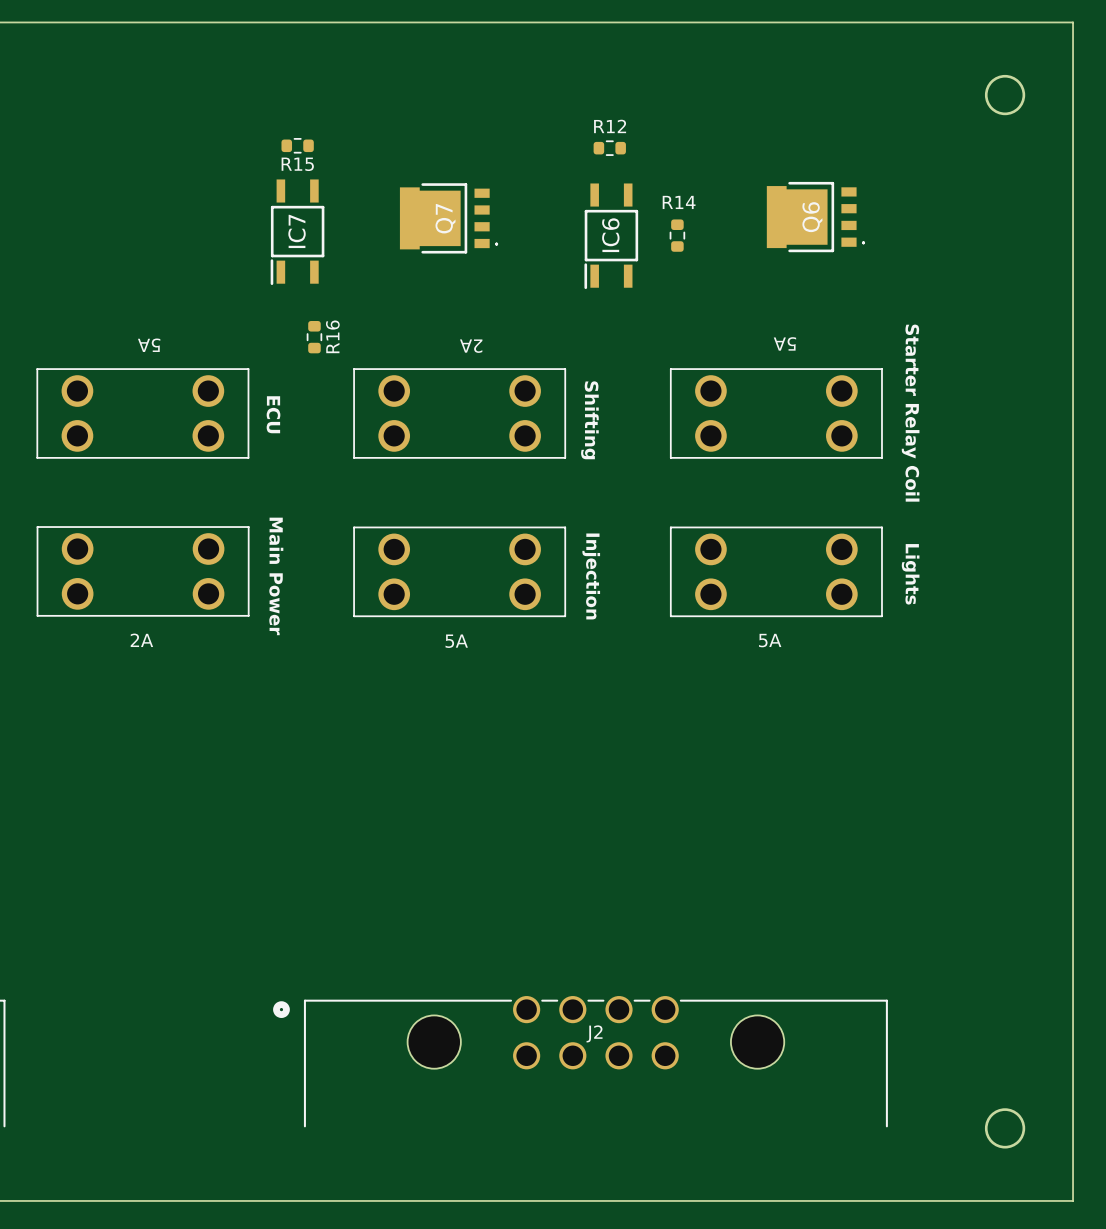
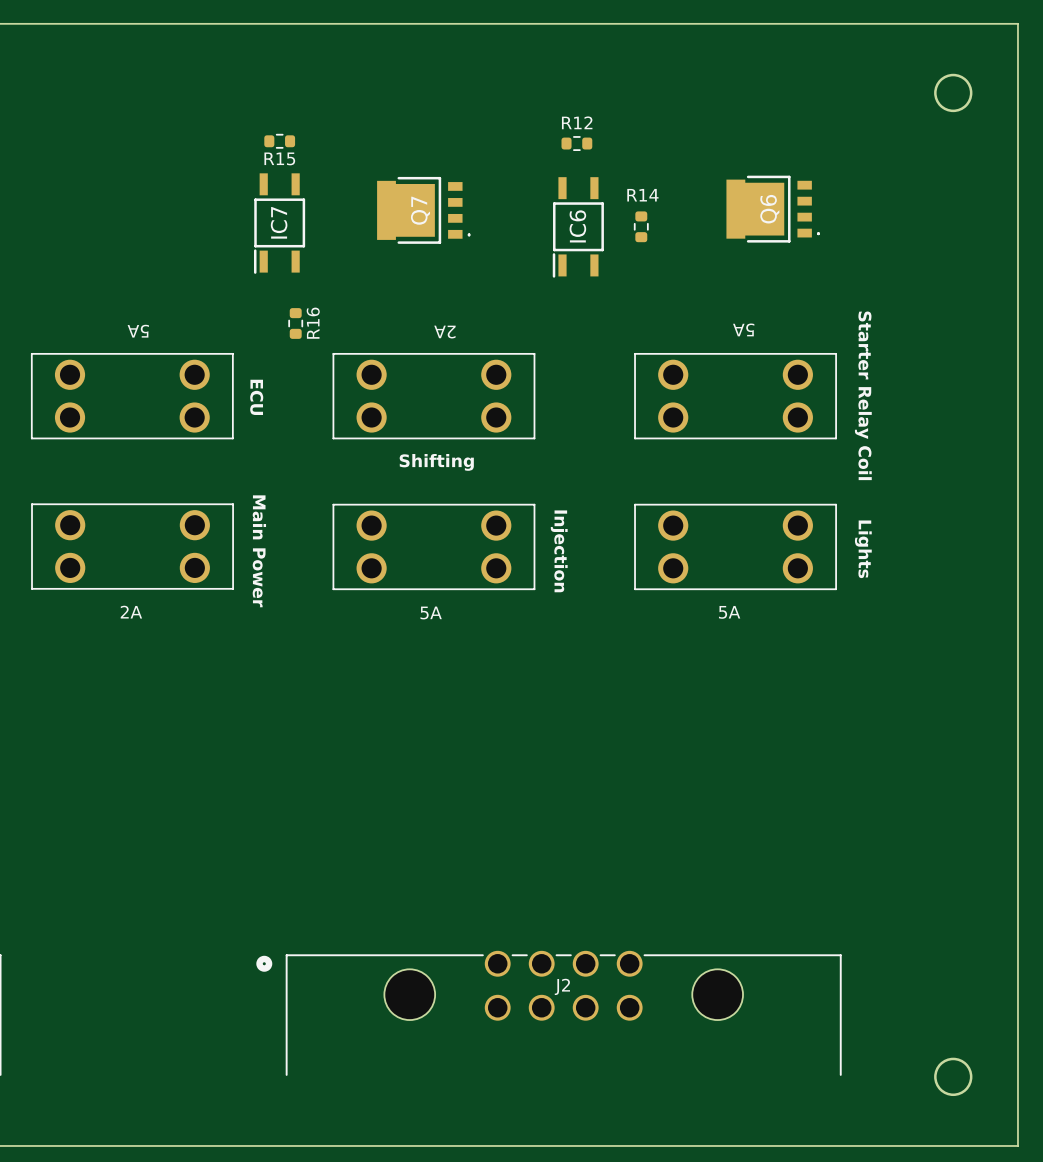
text rotation: 0° (589, 420) -> 90° counterclockwise (436, 462)
text position: Shifting (589, 420) -> Shifting (436, 462)

